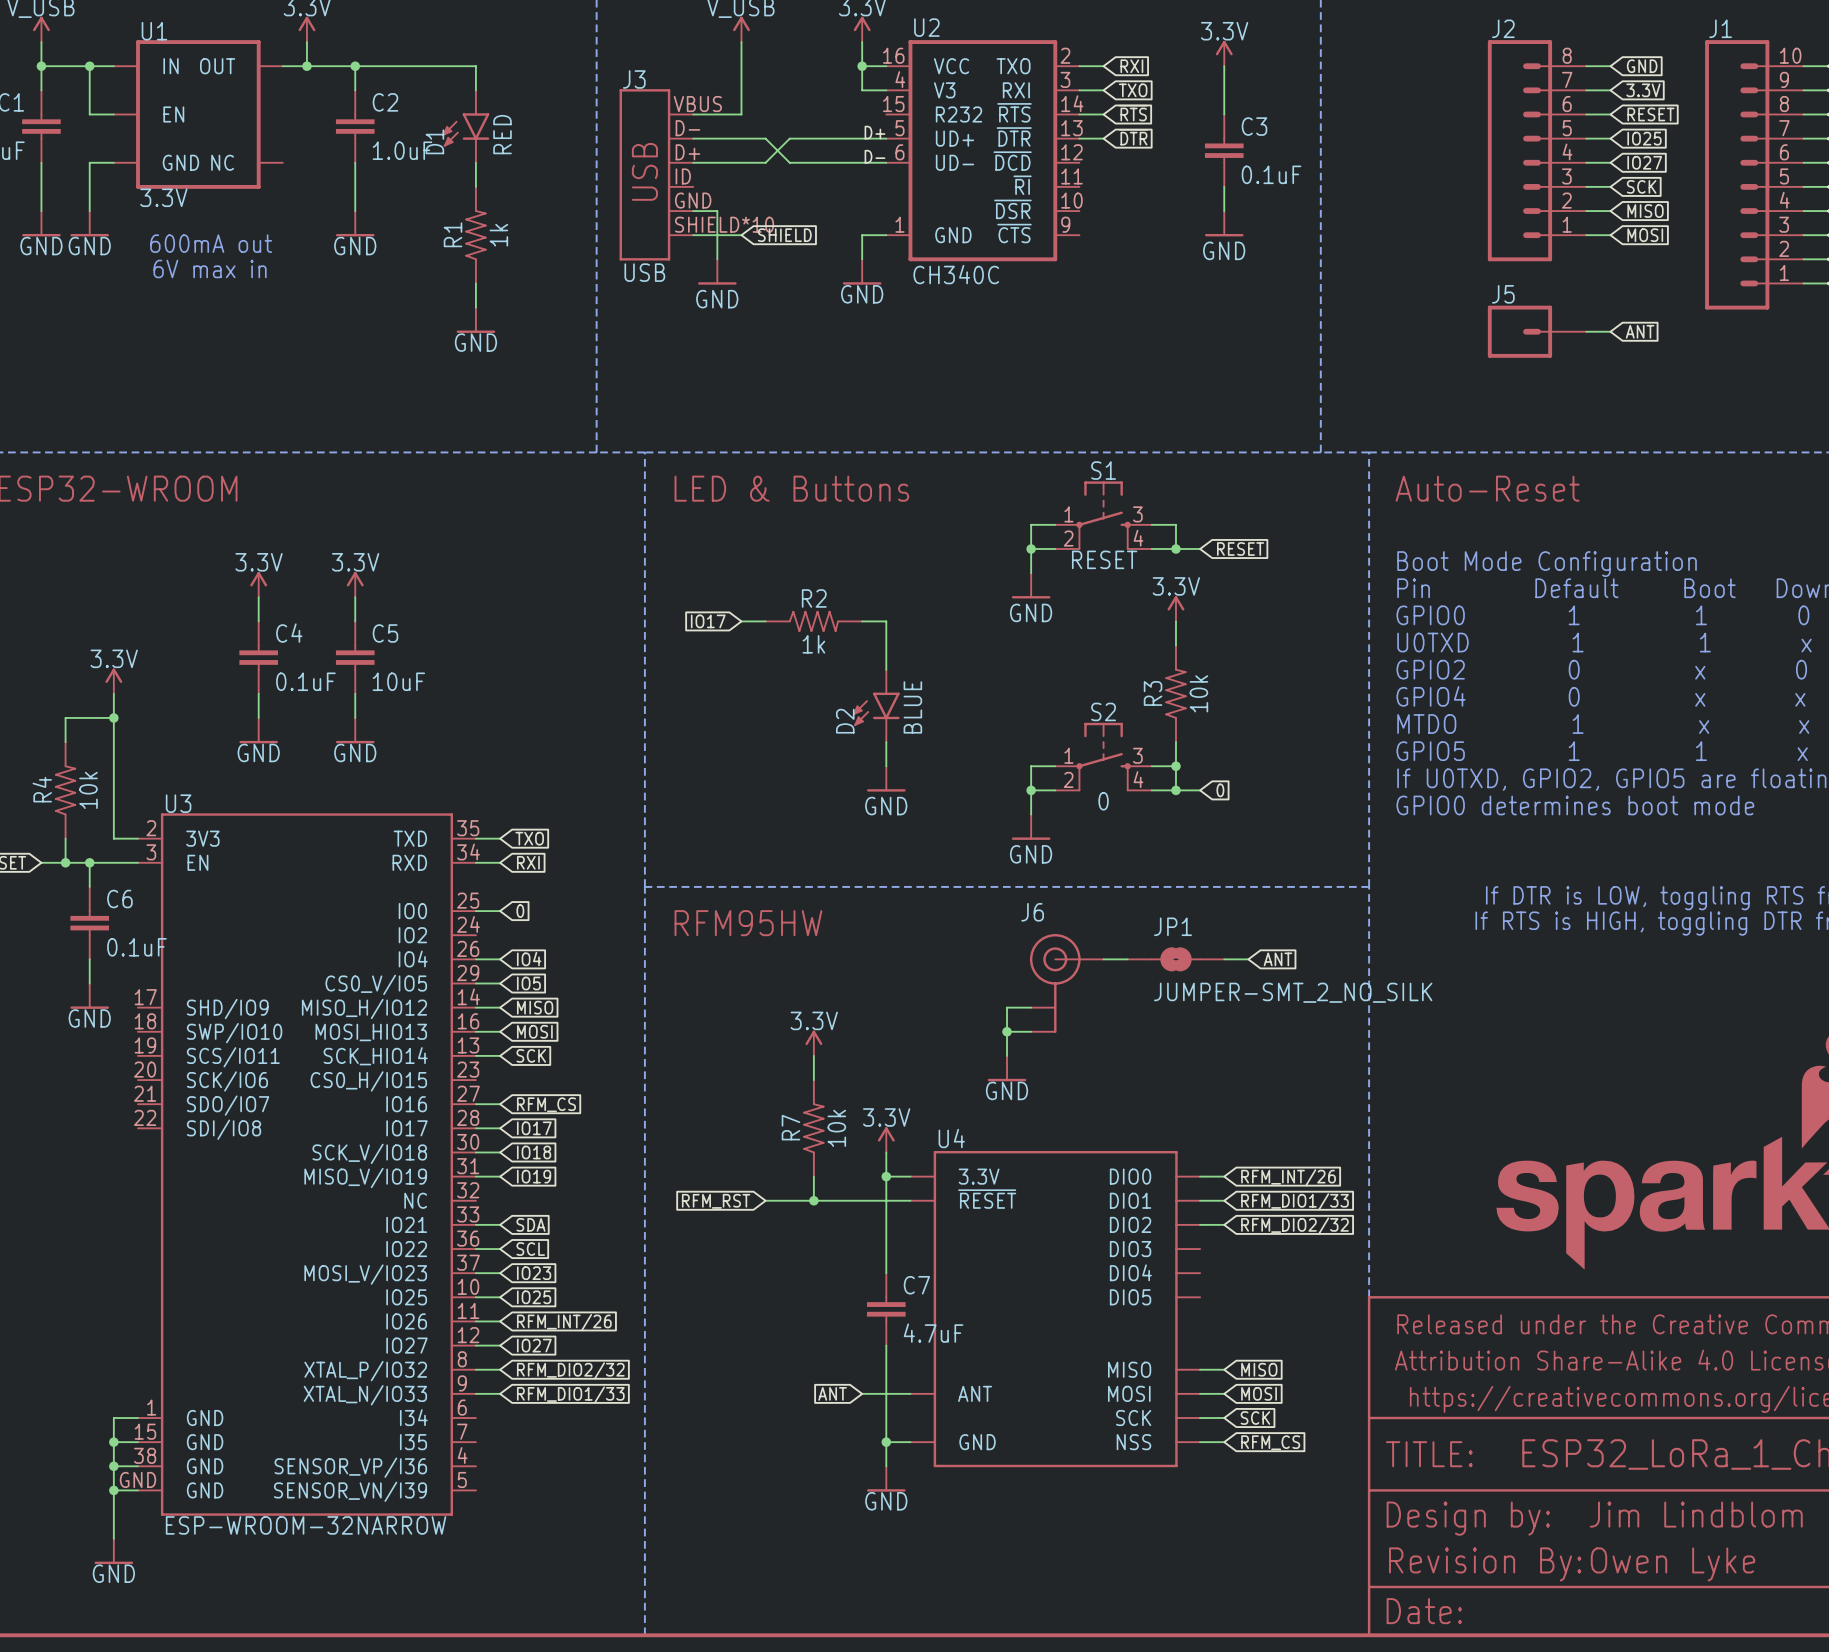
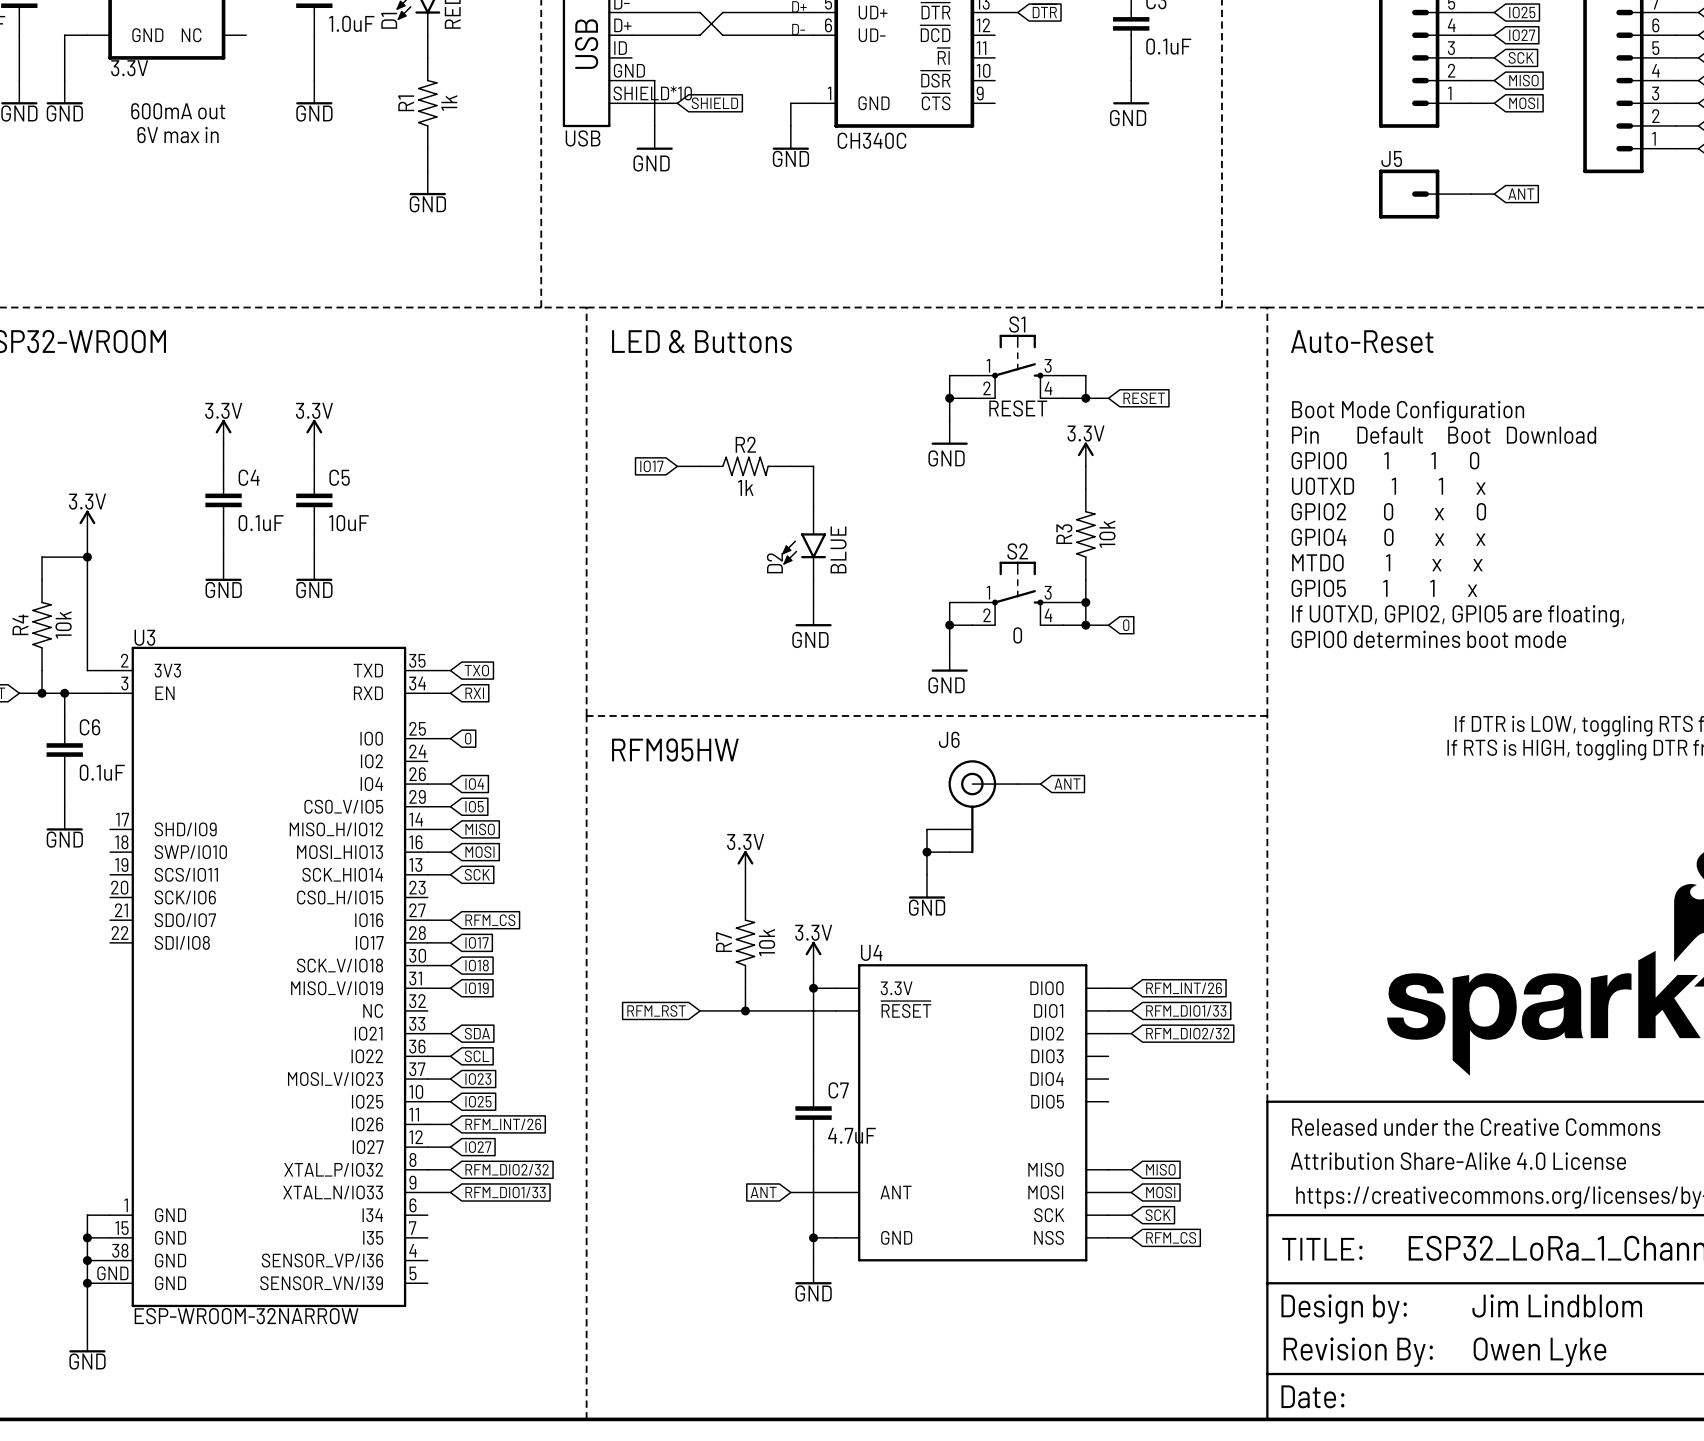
JP1: JUMPER-SMT_2_NO_SILK (1175, 959) -> none
wire: (1224, 959) (1248, 959) -> none
global label position: ANT (1278, 959) -> ANT (1067, 784)

